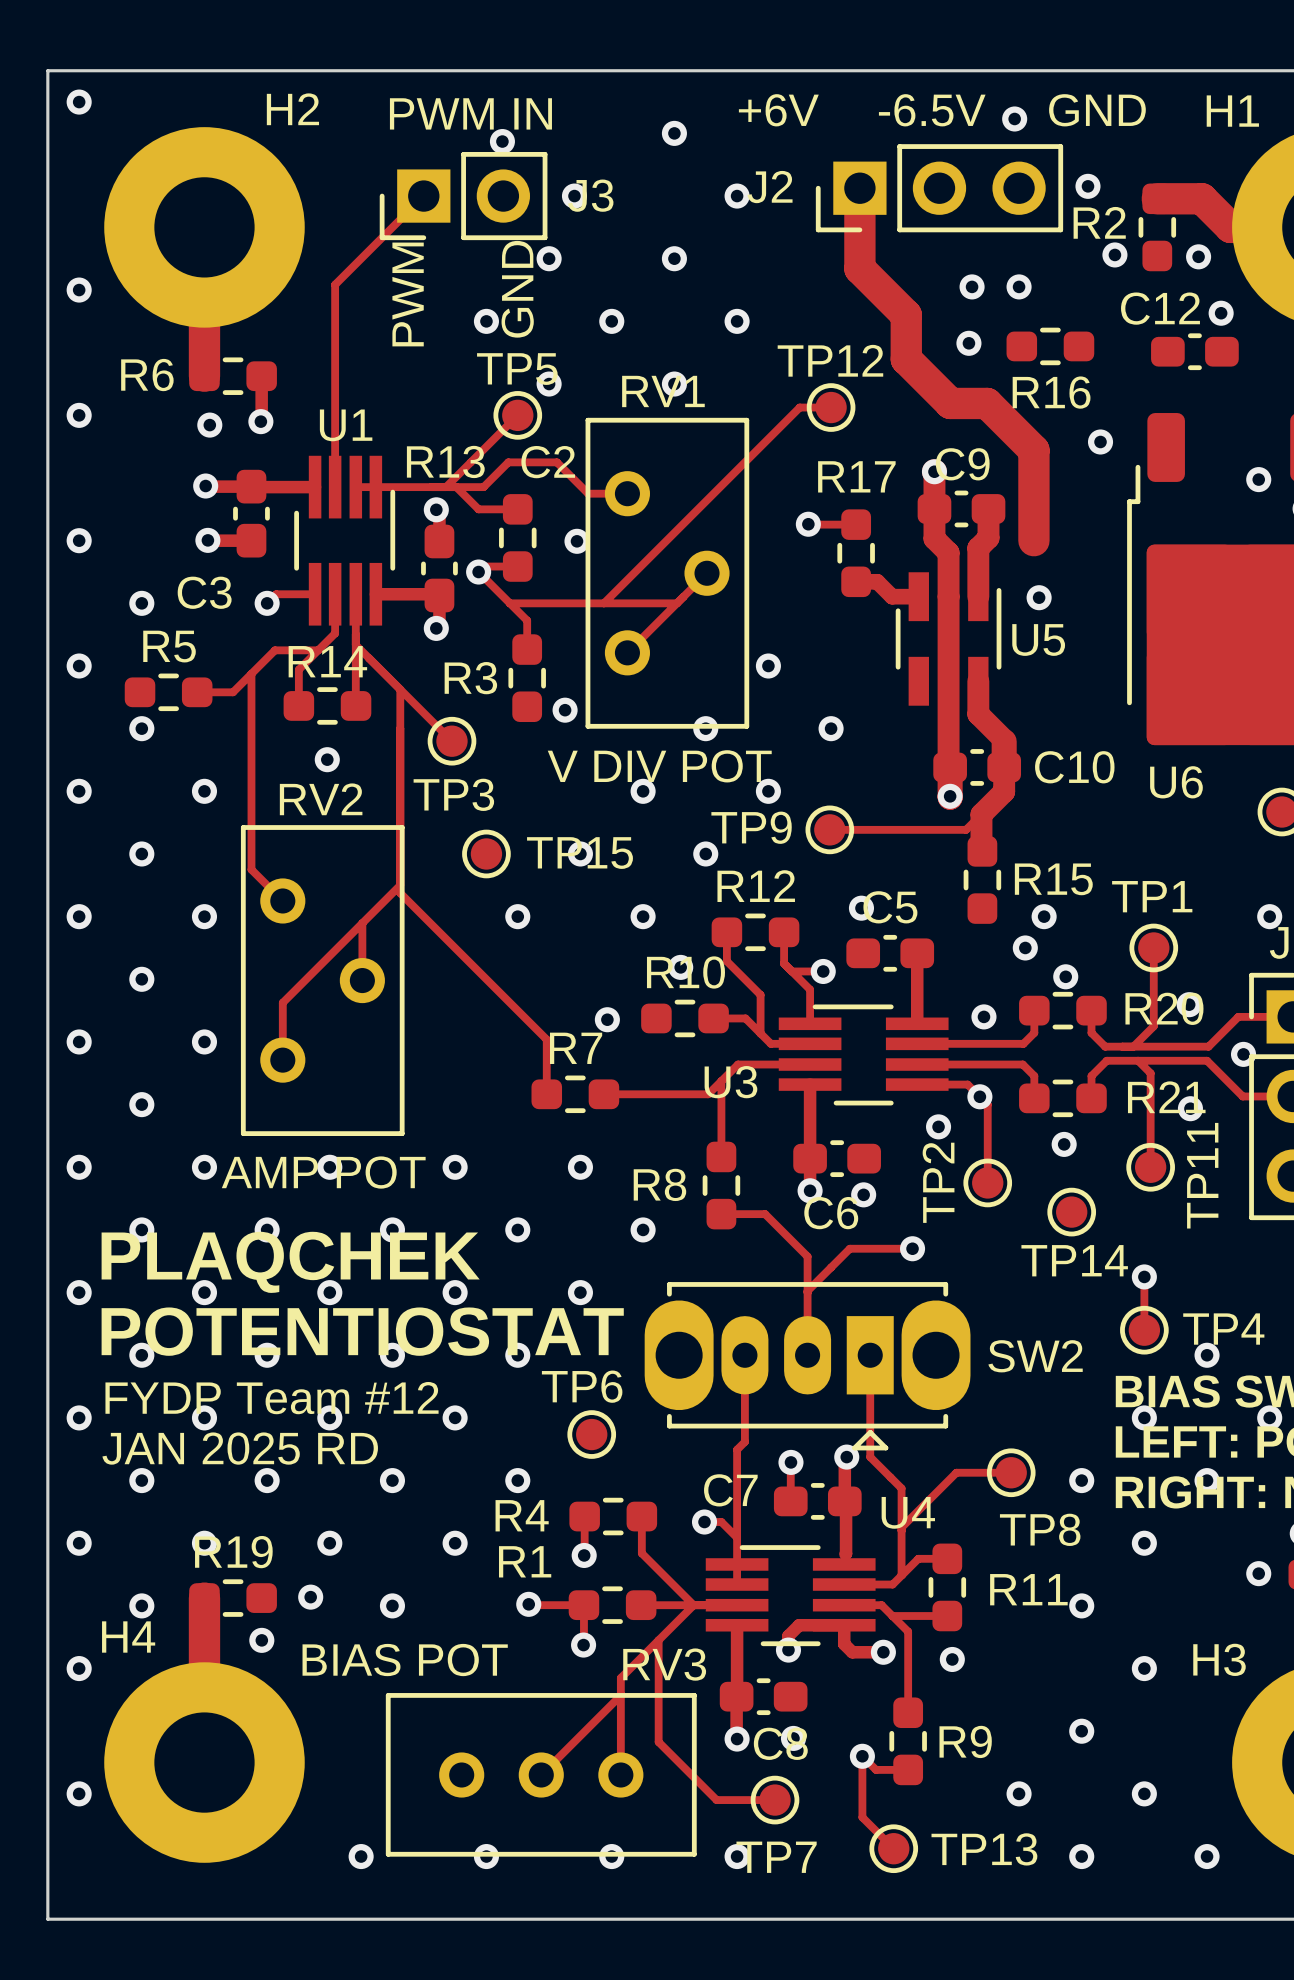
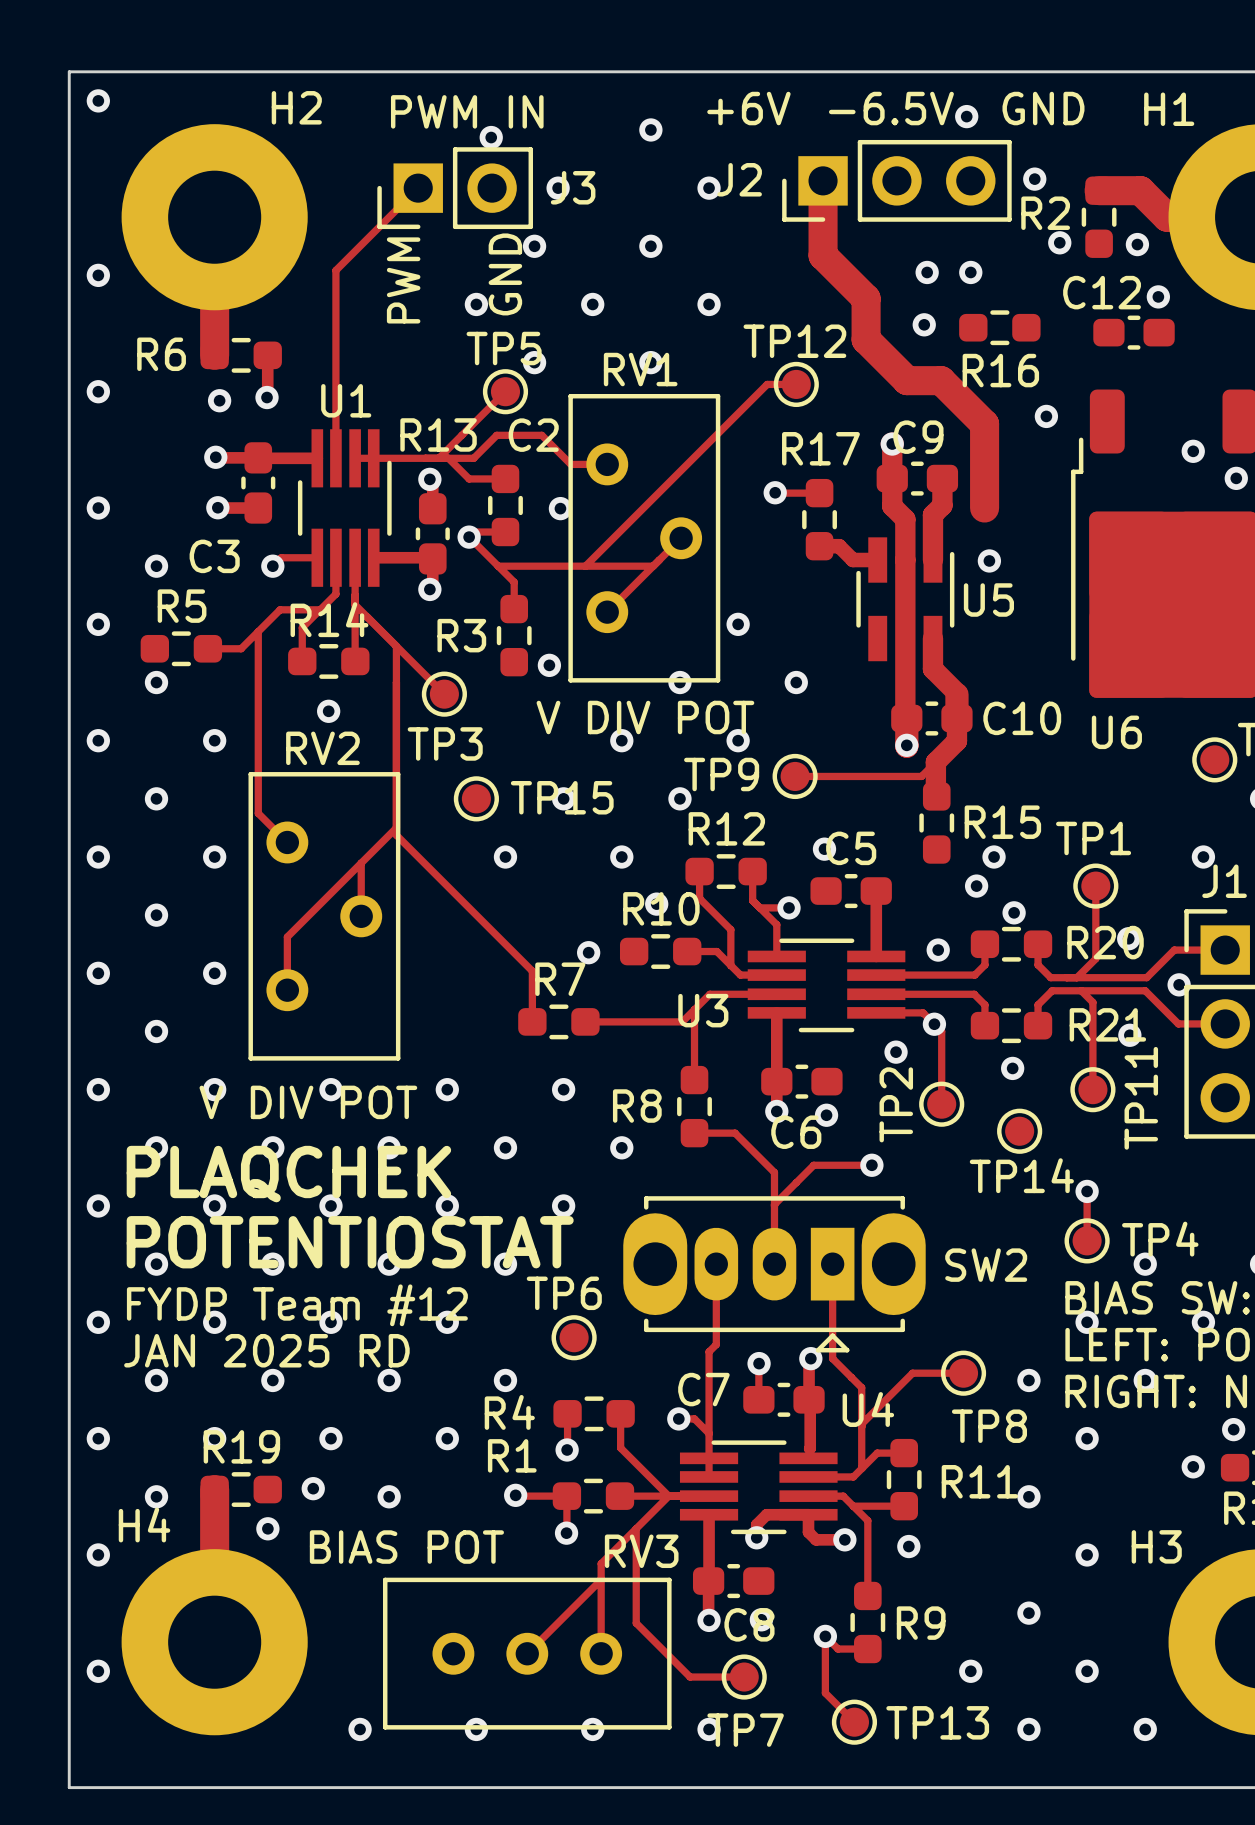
text: AMP POT (323, 1172) -> none
text: none -> V DIV POT (308, 1102)

